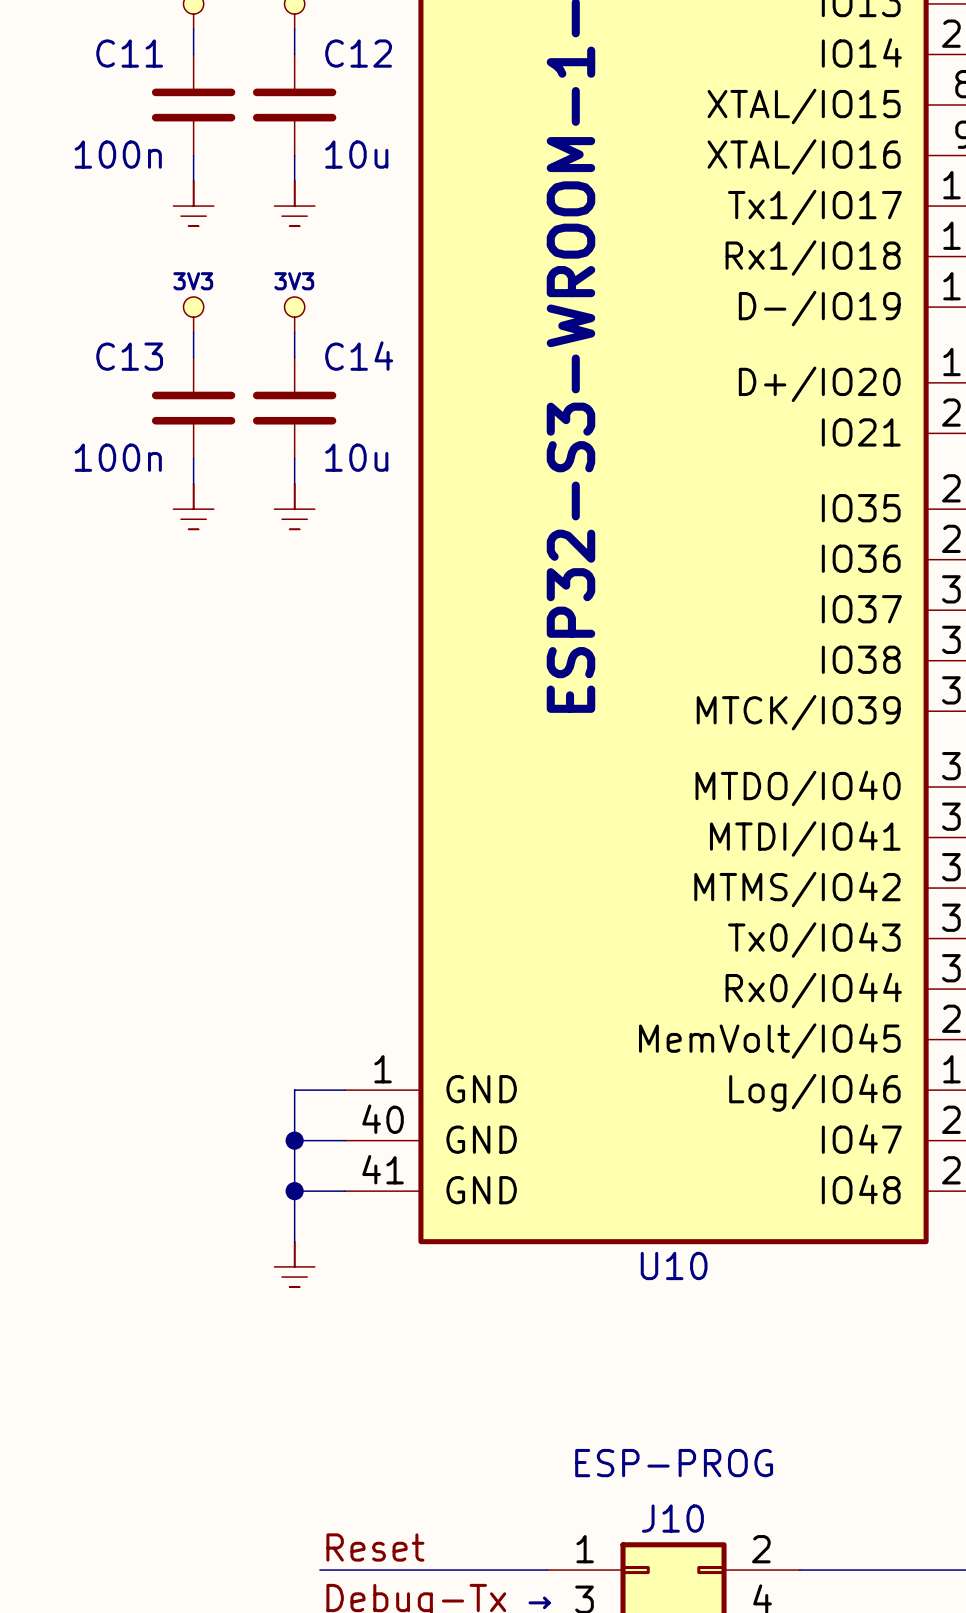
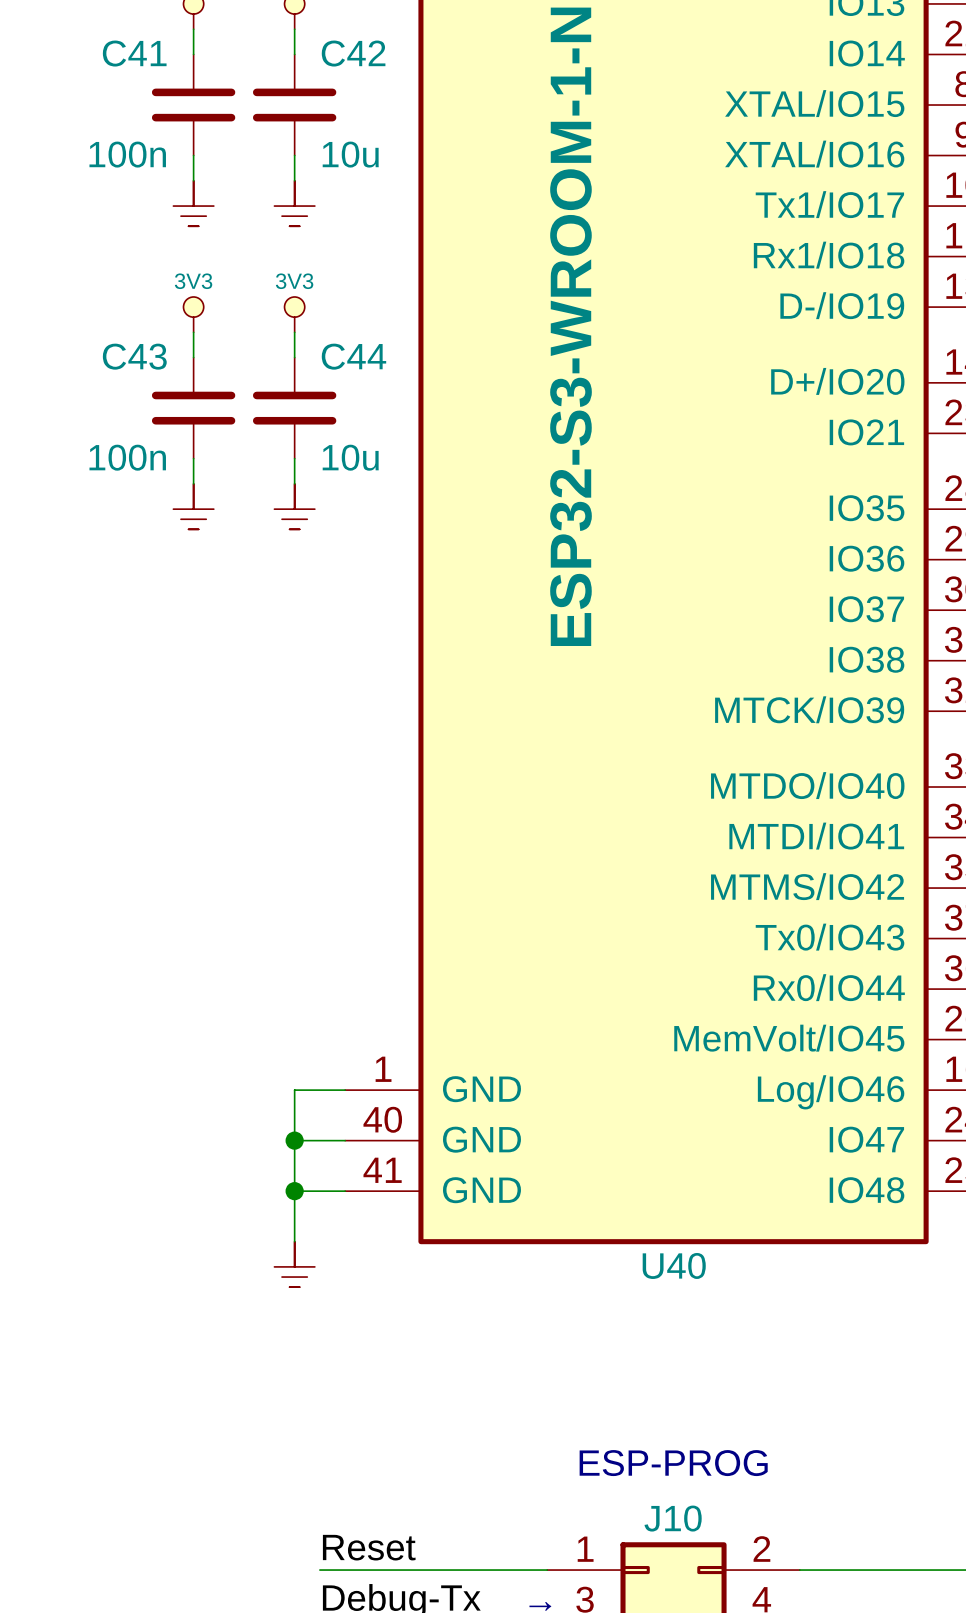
C11 name: C11 (129, 53) -> C41 (134, 53)
C12 name: C12 (358, 53) -> C42 (353, 53)
C13 name: C13 (129, 356) -> C43 (134, 356)
C14 name: C14 (359, 356) -> C44 (353, 356)
U10 name: U10 (674, 1265) -> U40 (674, 1265)

